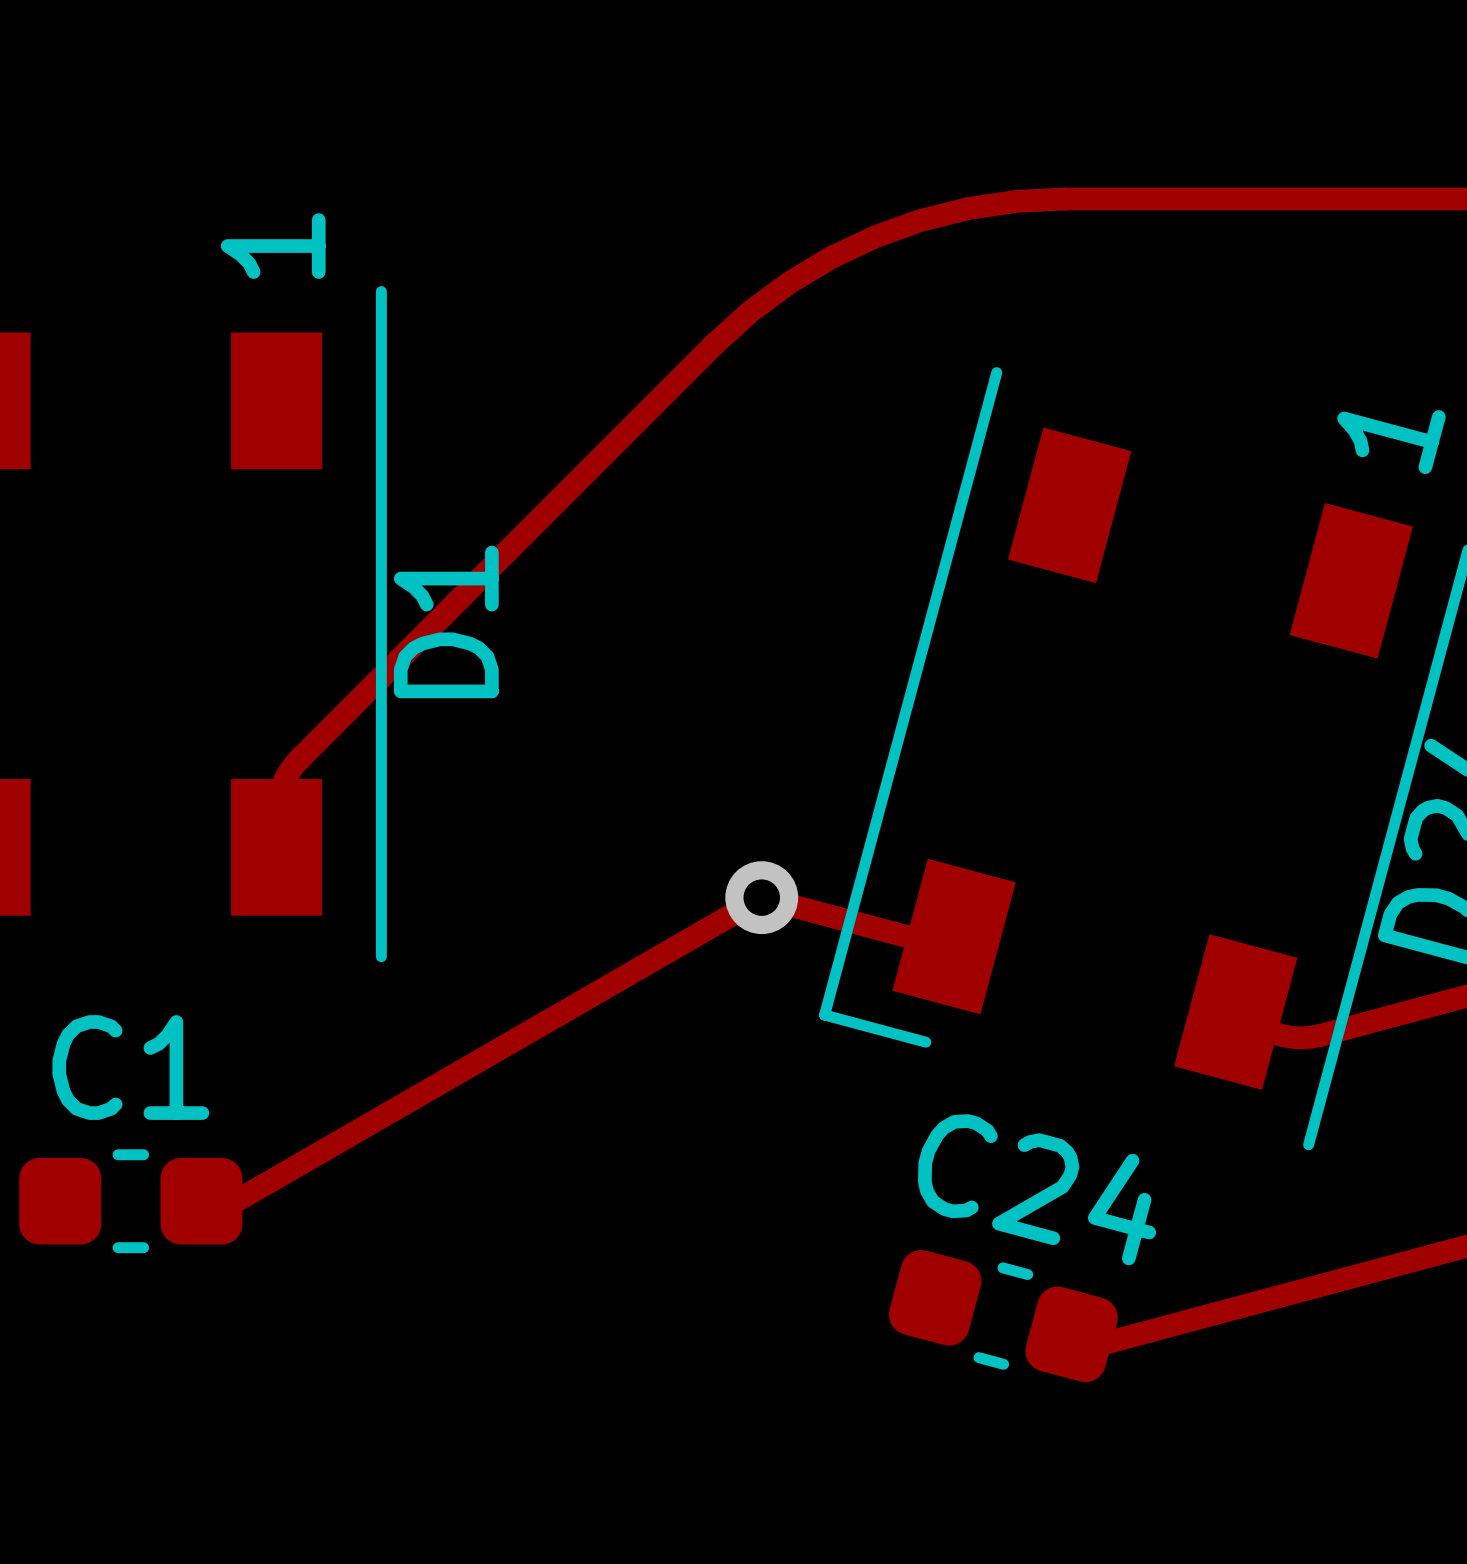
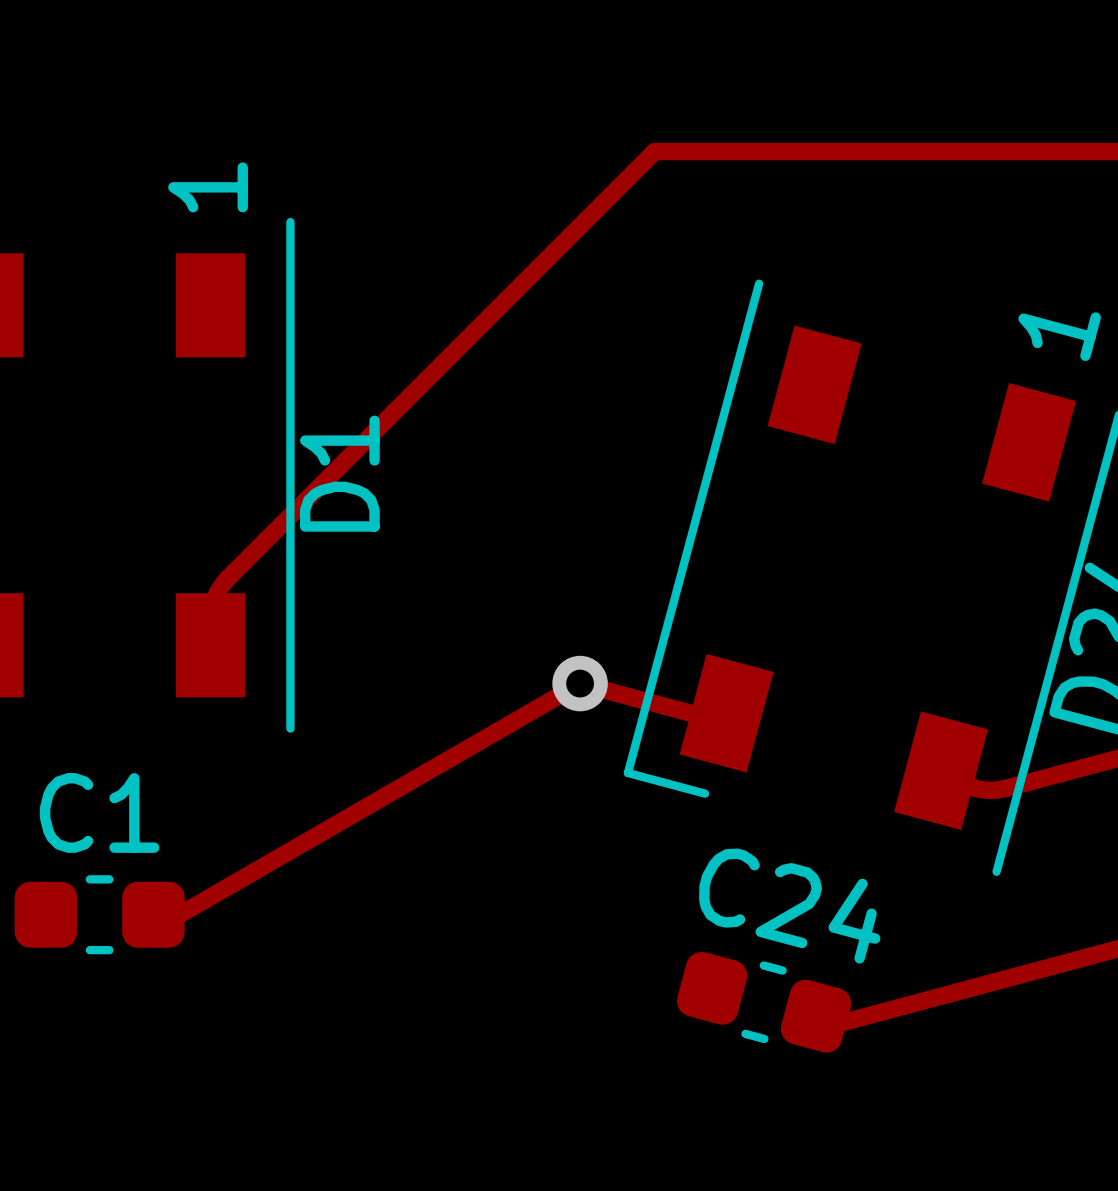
track: (1065, 199) (1016, 201) (968, 208) (921, 220) (875, 236) (831, 257) (789, 282) (750, 311) (714, 344) -> (811, 151) (654, 151) (544, 262)

